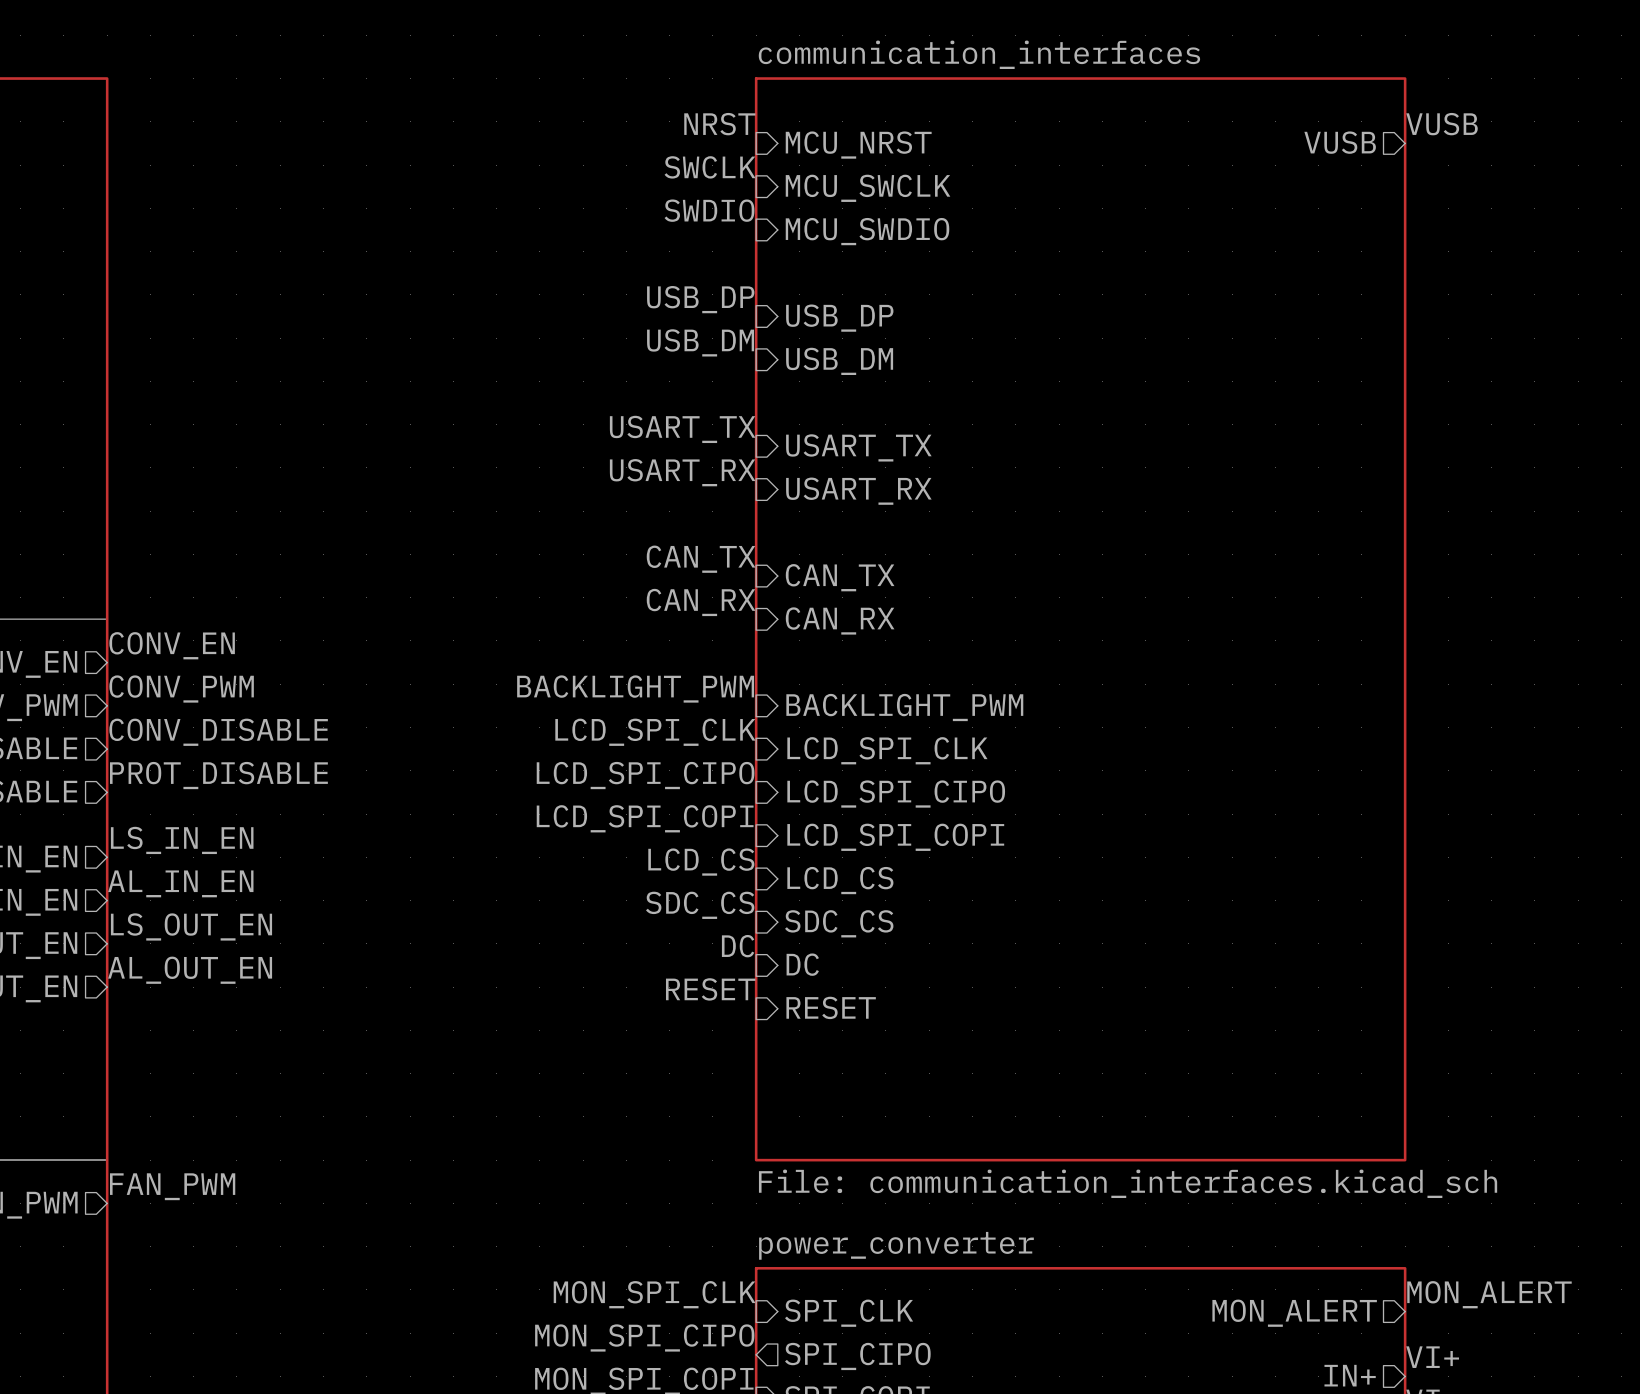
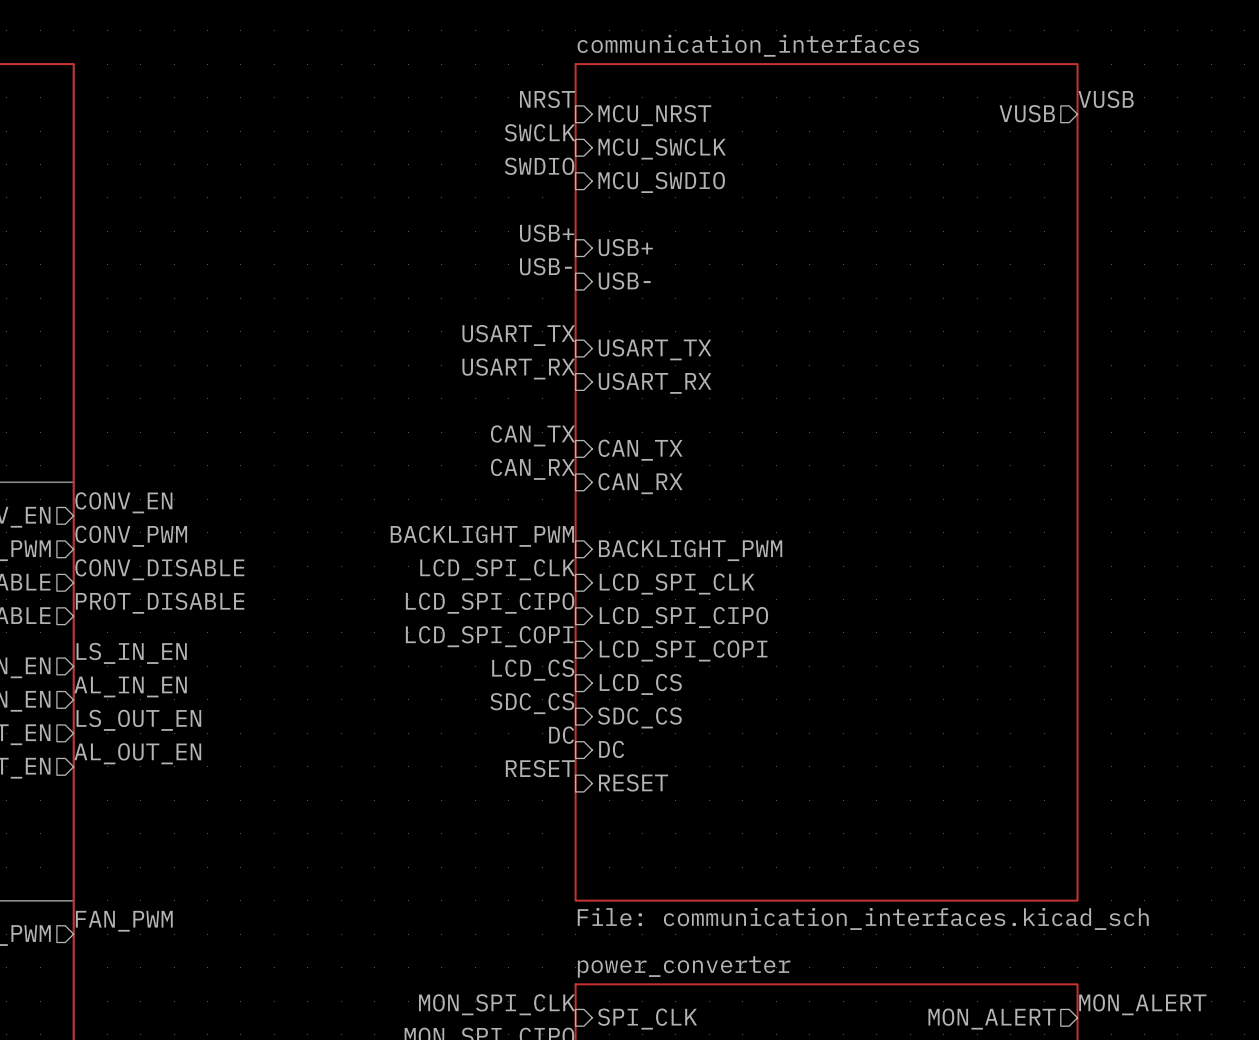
label: USB_DP (700, 299) -> USB+ (547, 233)
sheet pin: USB_DP (839, 318) -> USB+ (625, 247)
label: USB_DM (700, 342) -> USB- (545, 266)
sheet pin: USB_DM (839, 361) -> USB- (624, 280)

